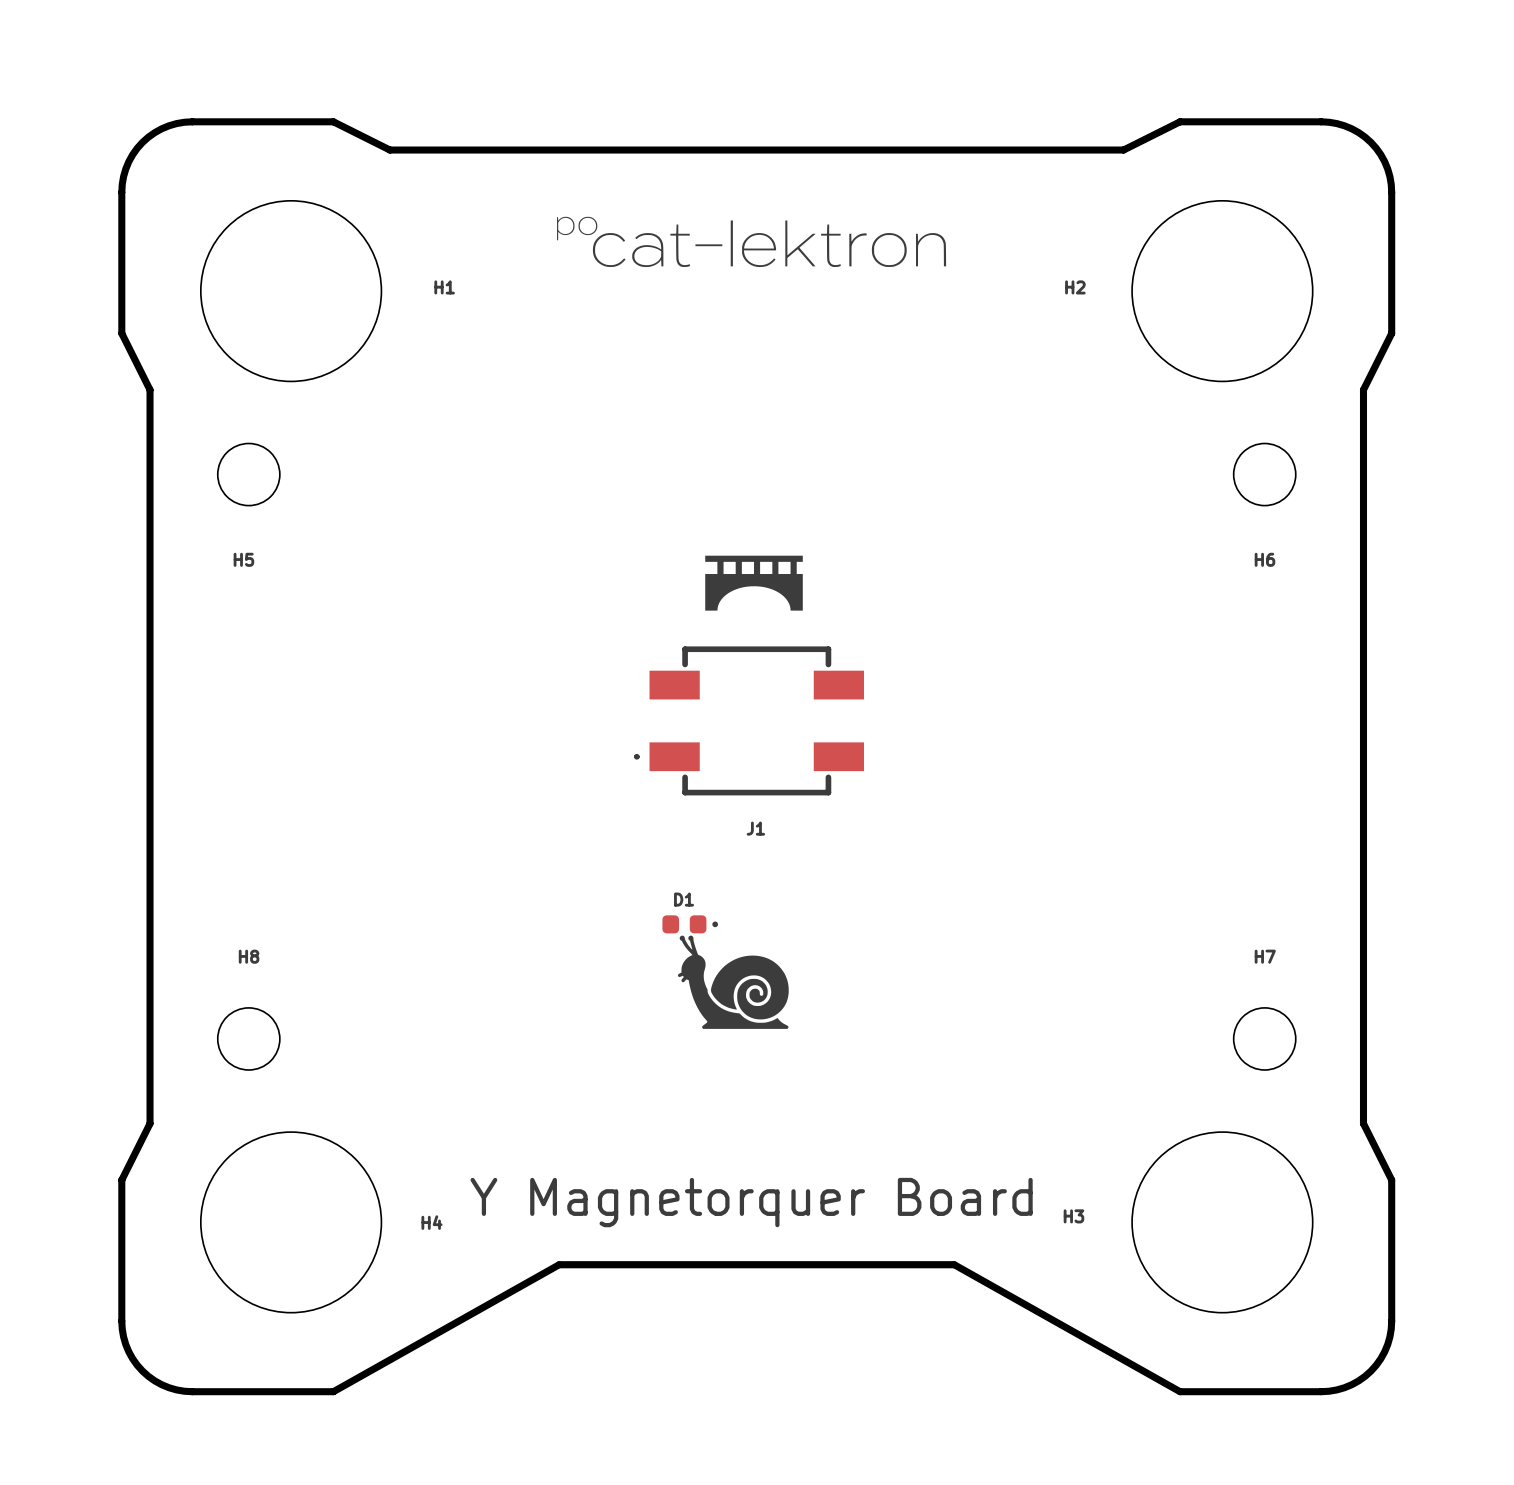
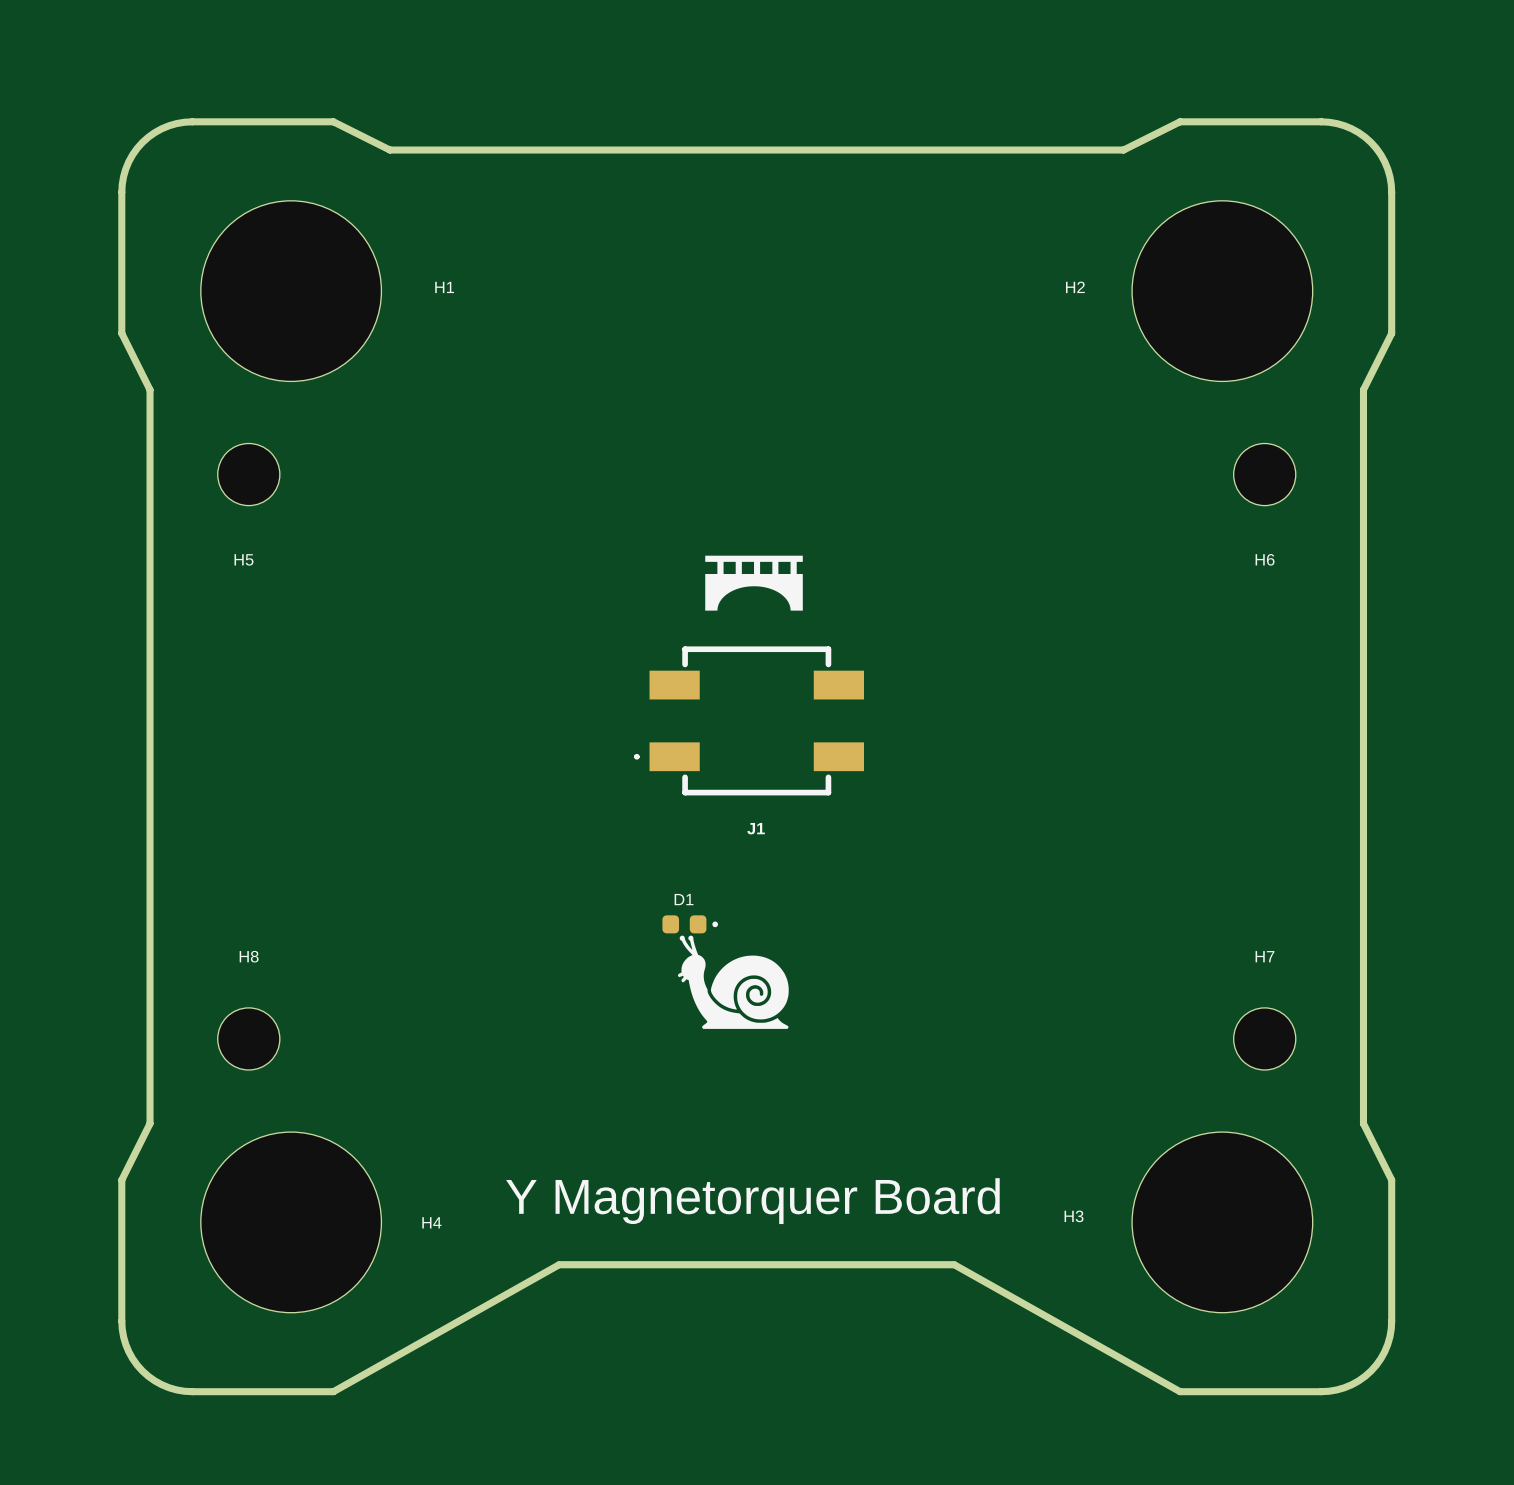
drawing: [557, 216, 947, 268] -> none

